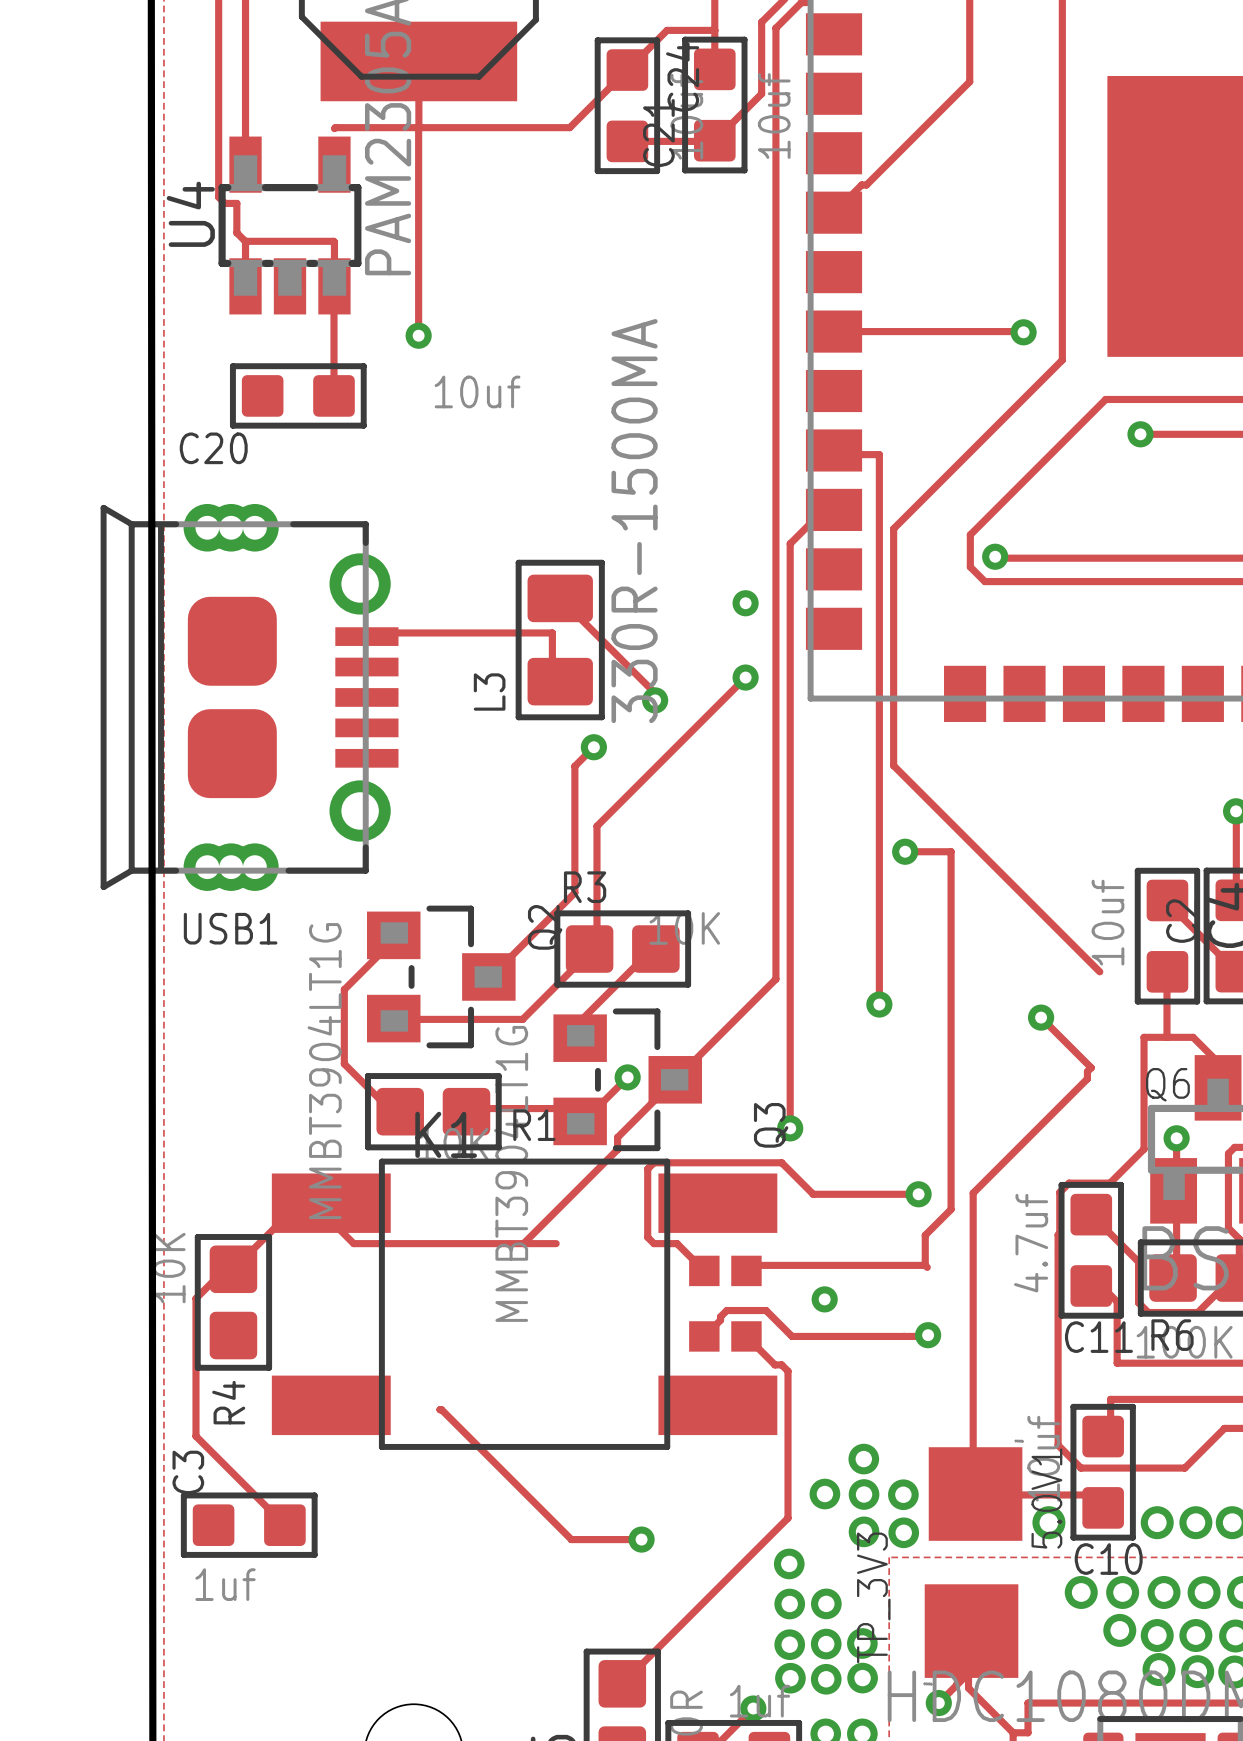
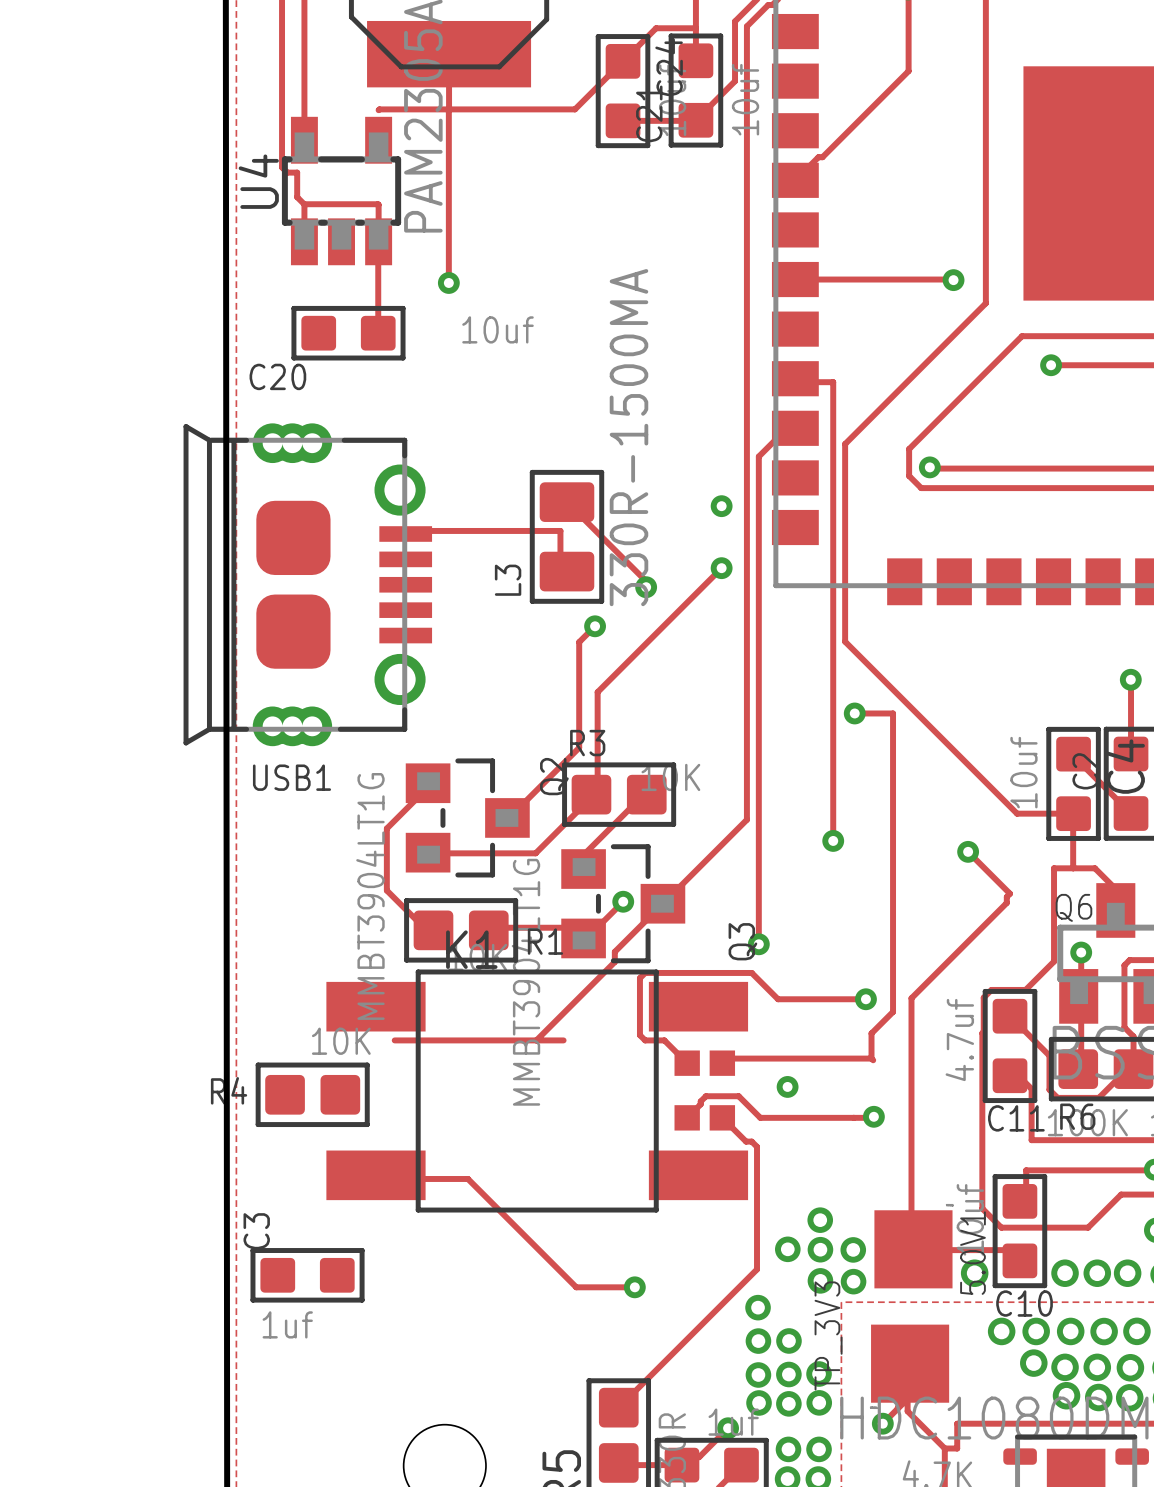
track: none -> (1017, 813) (1073, 813)
track: (353, 1243) (331, 1221) (331, 1203) (299, 1203) (233, 1269) (225, 1269) (195, 1298) (195, 1436) (284, 1525) -> none
R4 rotation: 0° (233, 1302) -> 90° clockwise (312, 1094)
track: none -> (379, 1178) (466, 1178)

